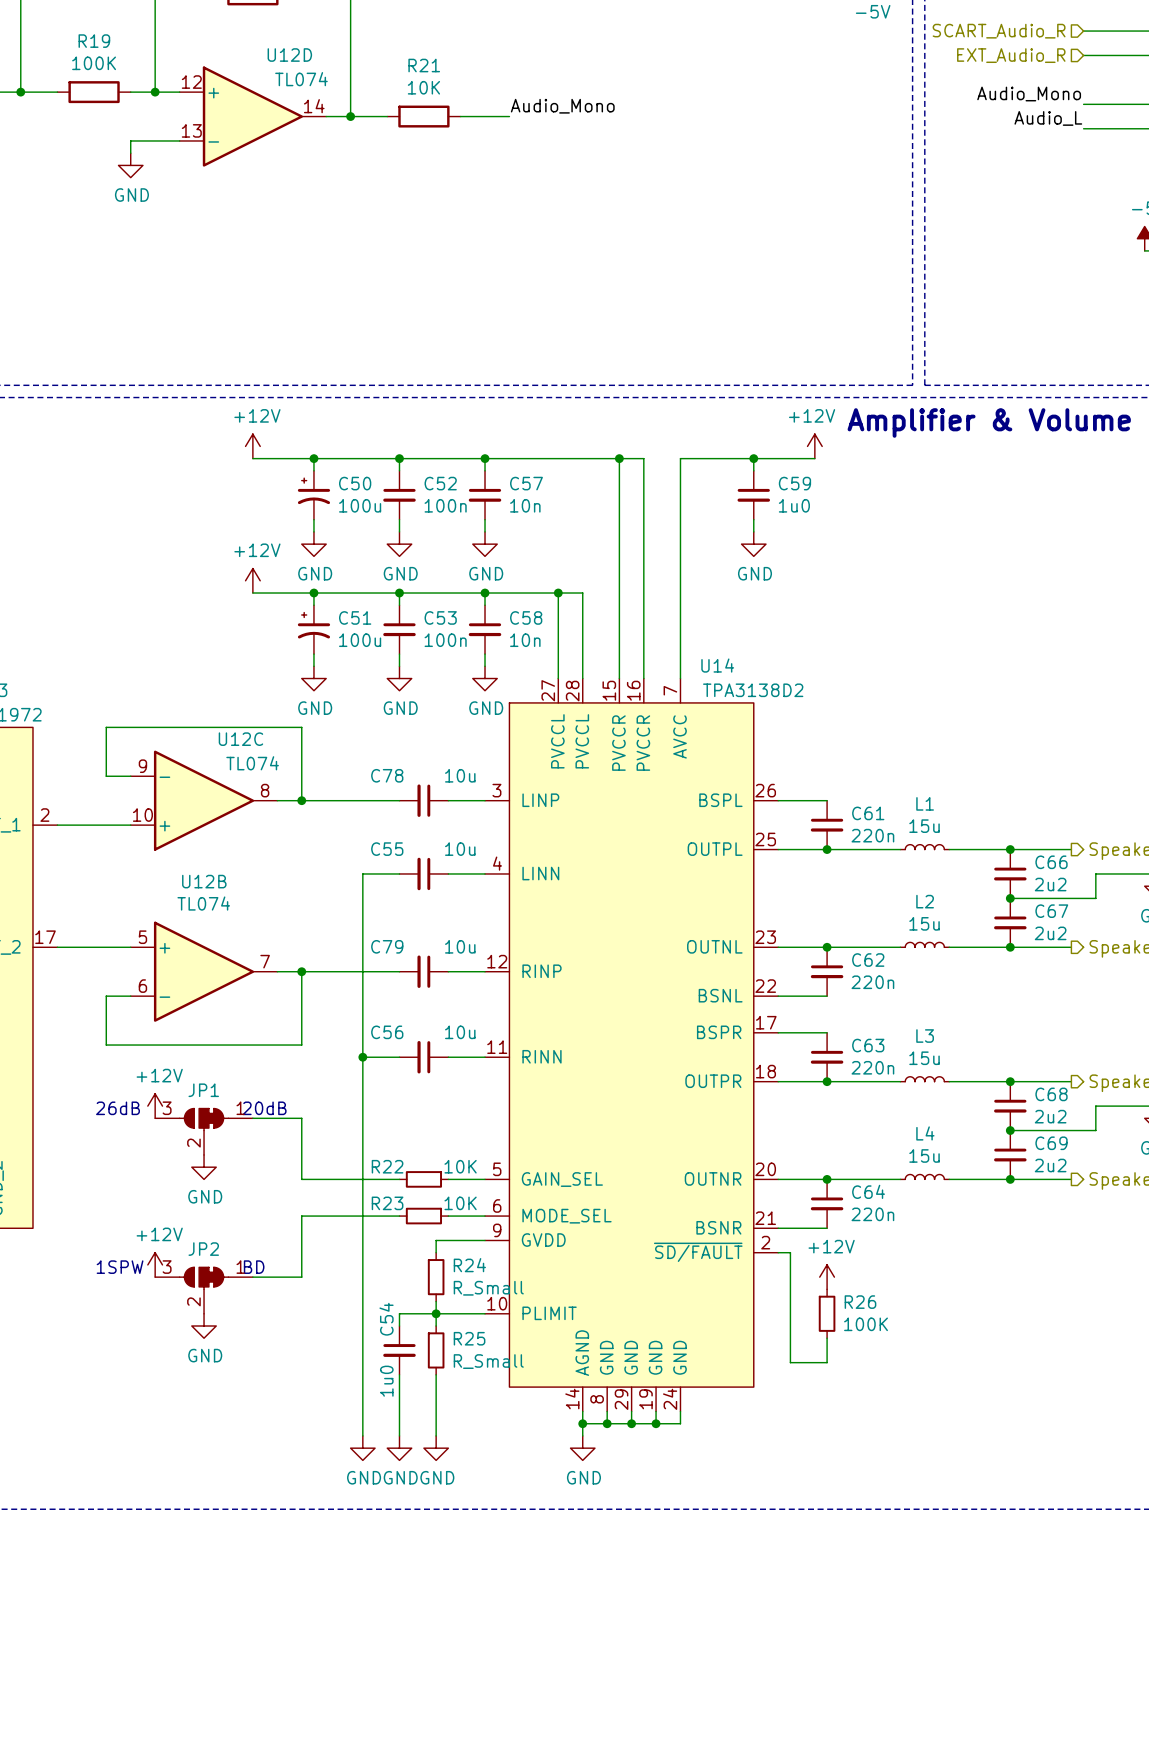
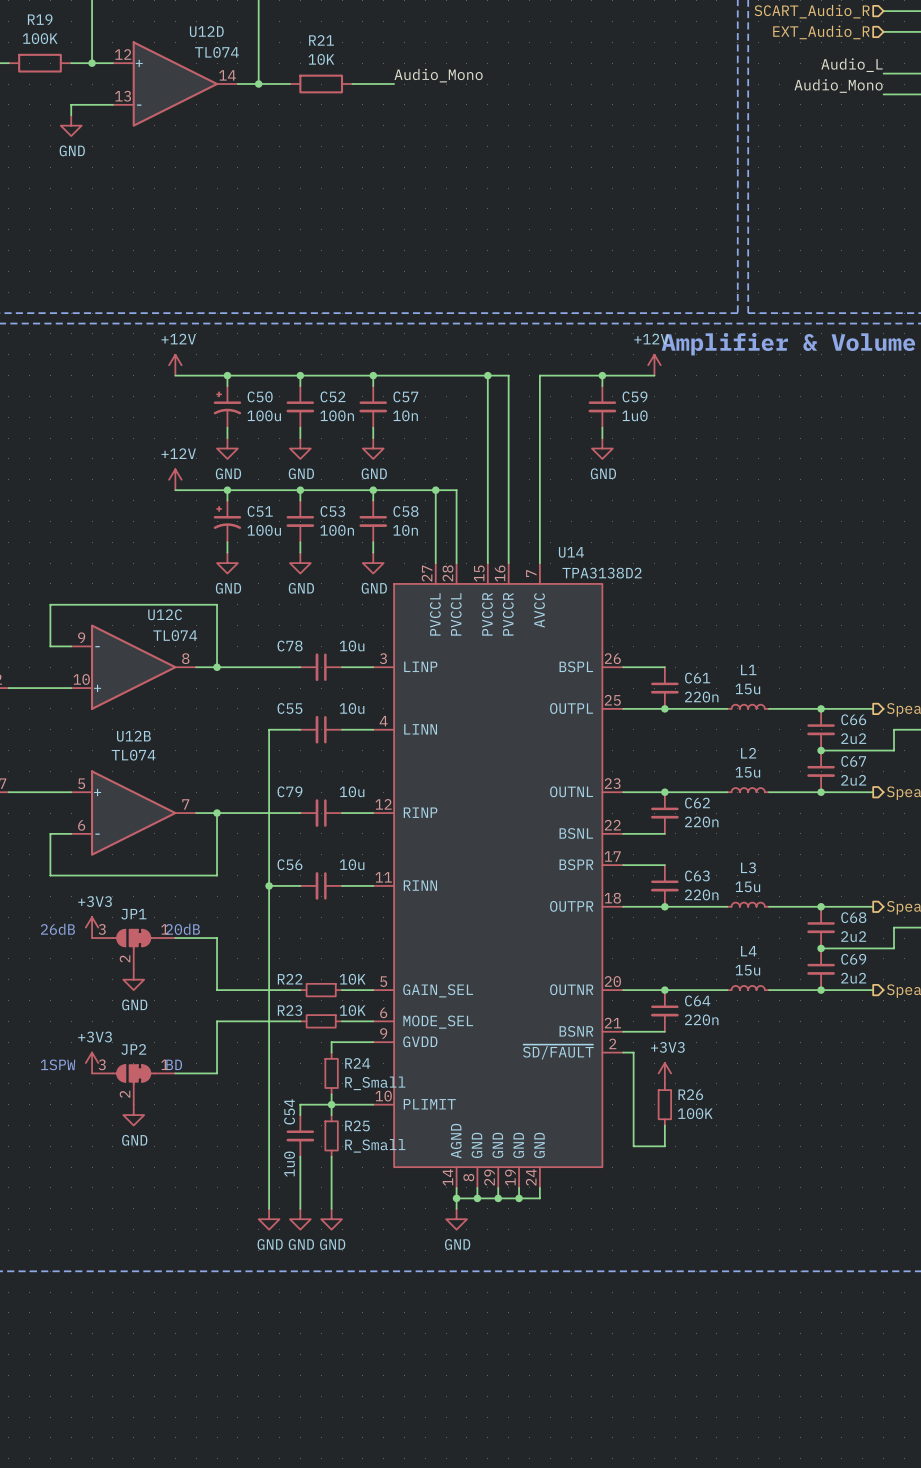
label: Audio_Mono (1029, 94) -> Audio_L (851, 65)
label: Audio_L (1048, 118) -> Audio_Mono (838, 86)
power symbol: +12V (155, 1106) -> +3V3 (92, 927)
power symbol: +12V (155, 1264) -> +3V3 (92, 1063)
power symbol: +12V (827, 1277) -> +3V3 (664, 1073)

